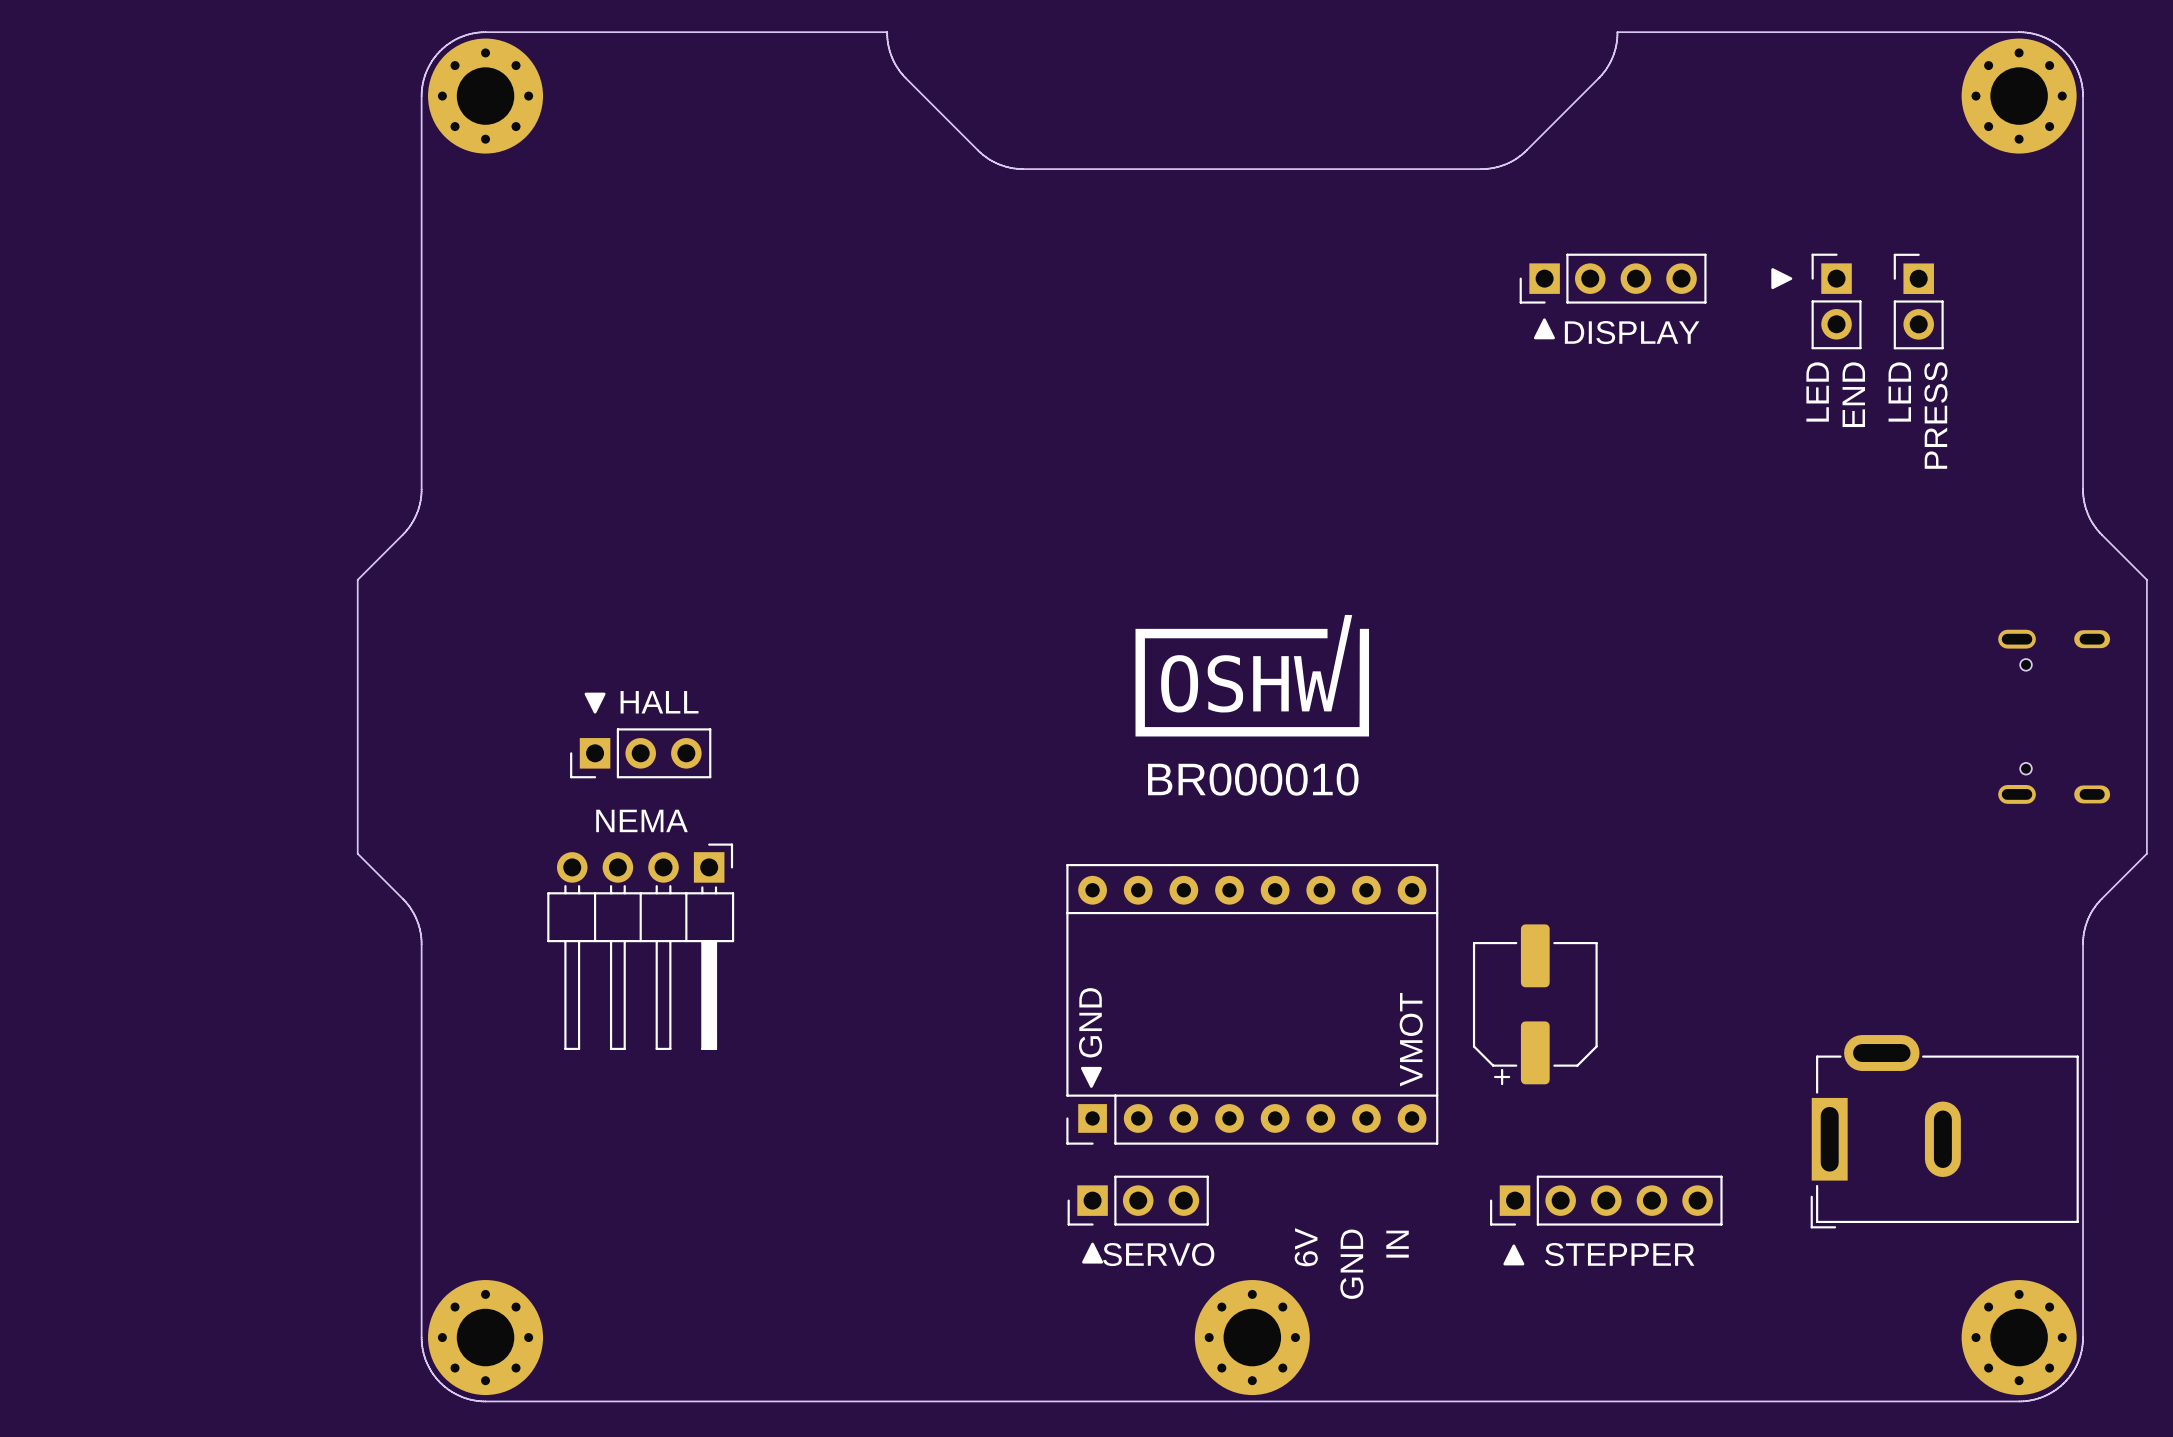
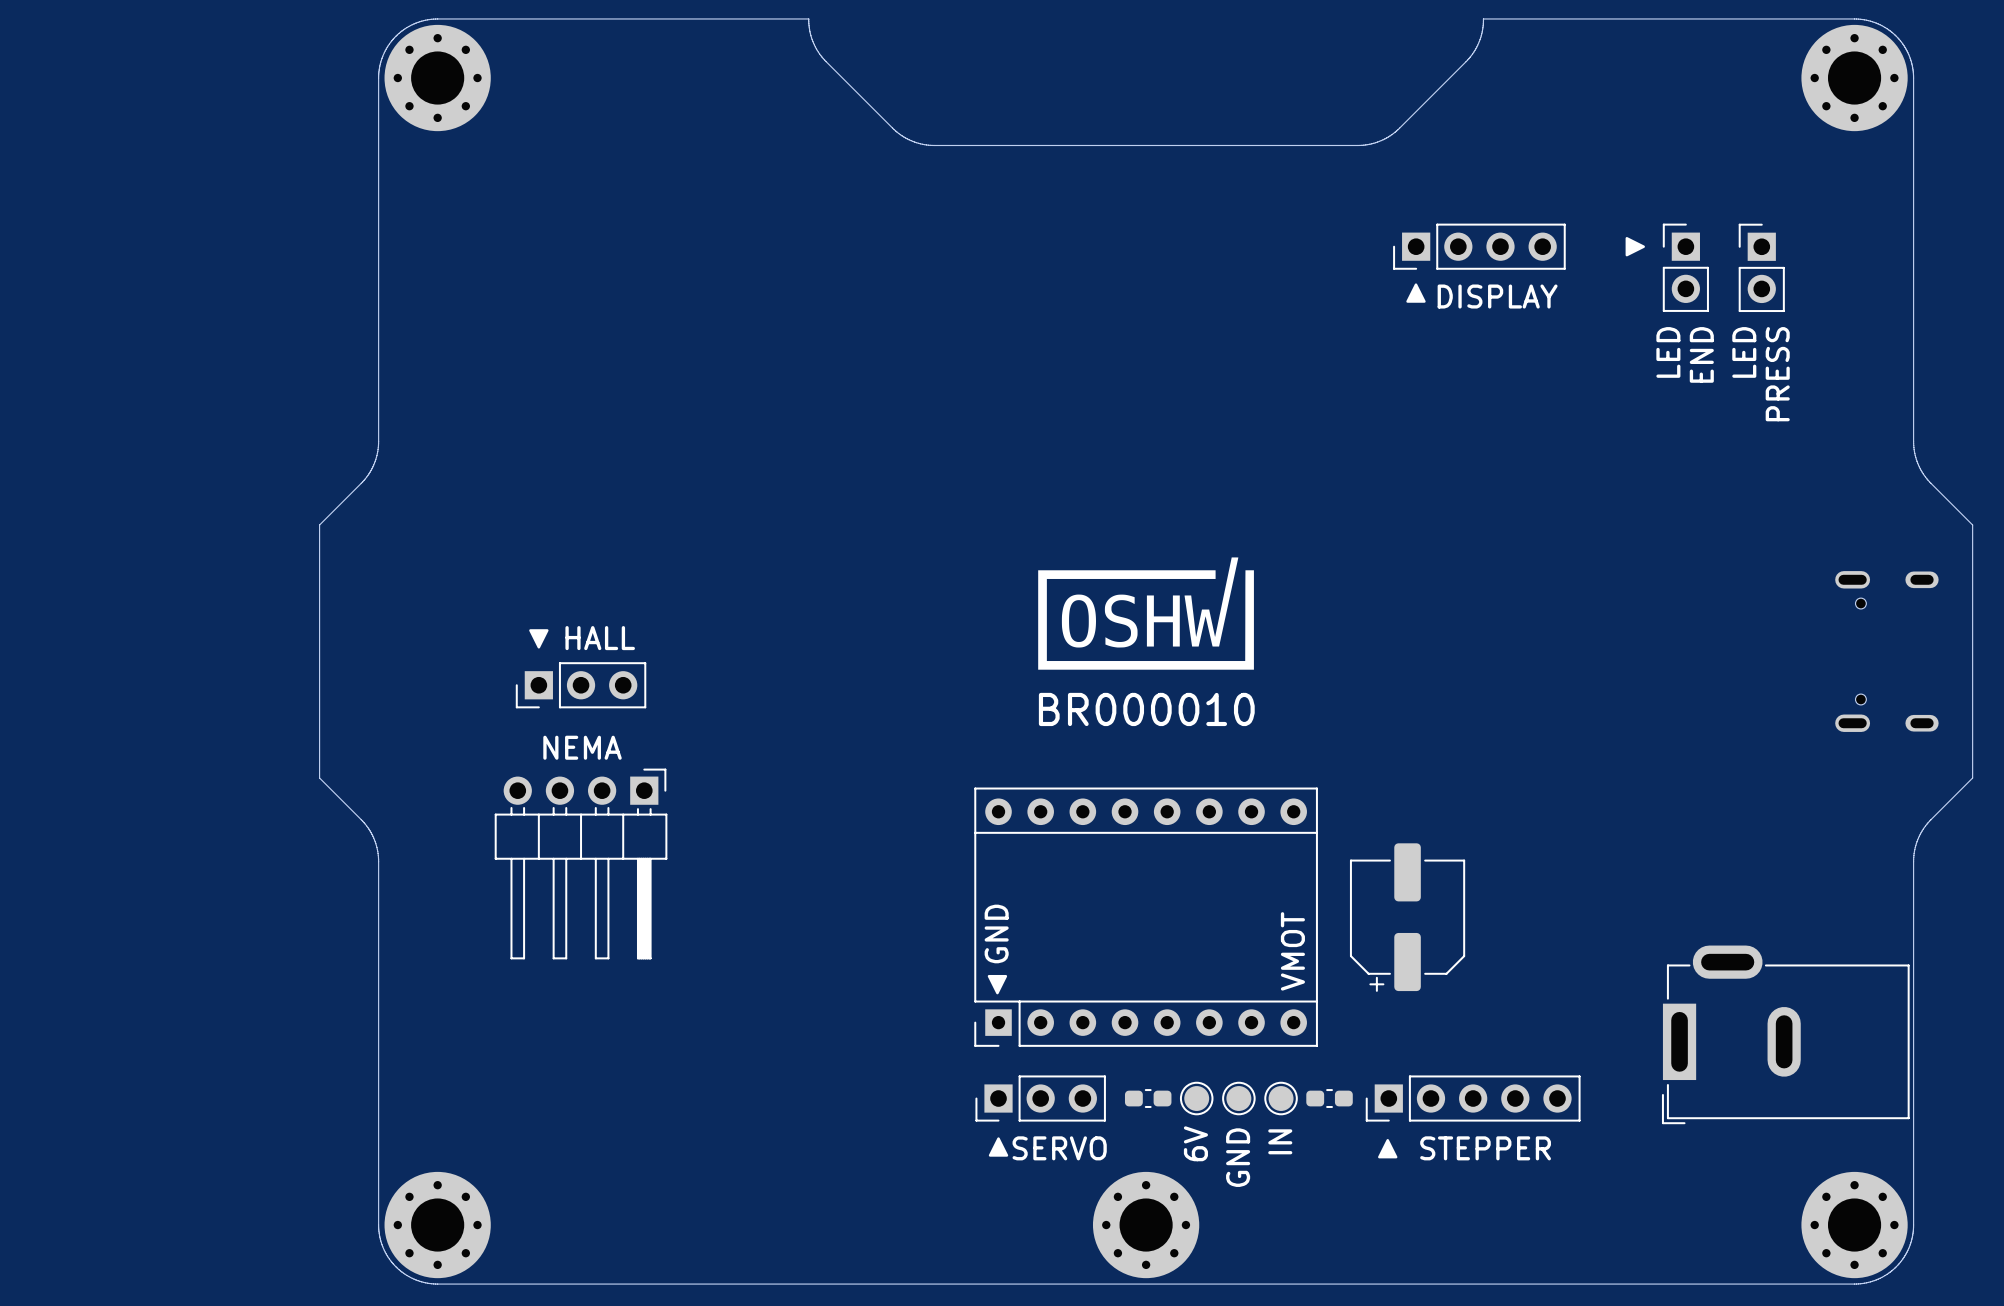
part: none -> (1148, 1098)
part: none -> (1196, 1098)
part: none -> (1238, 1098)
part: none -> (1281, 1098)
part: none -> (1329, 1098)

